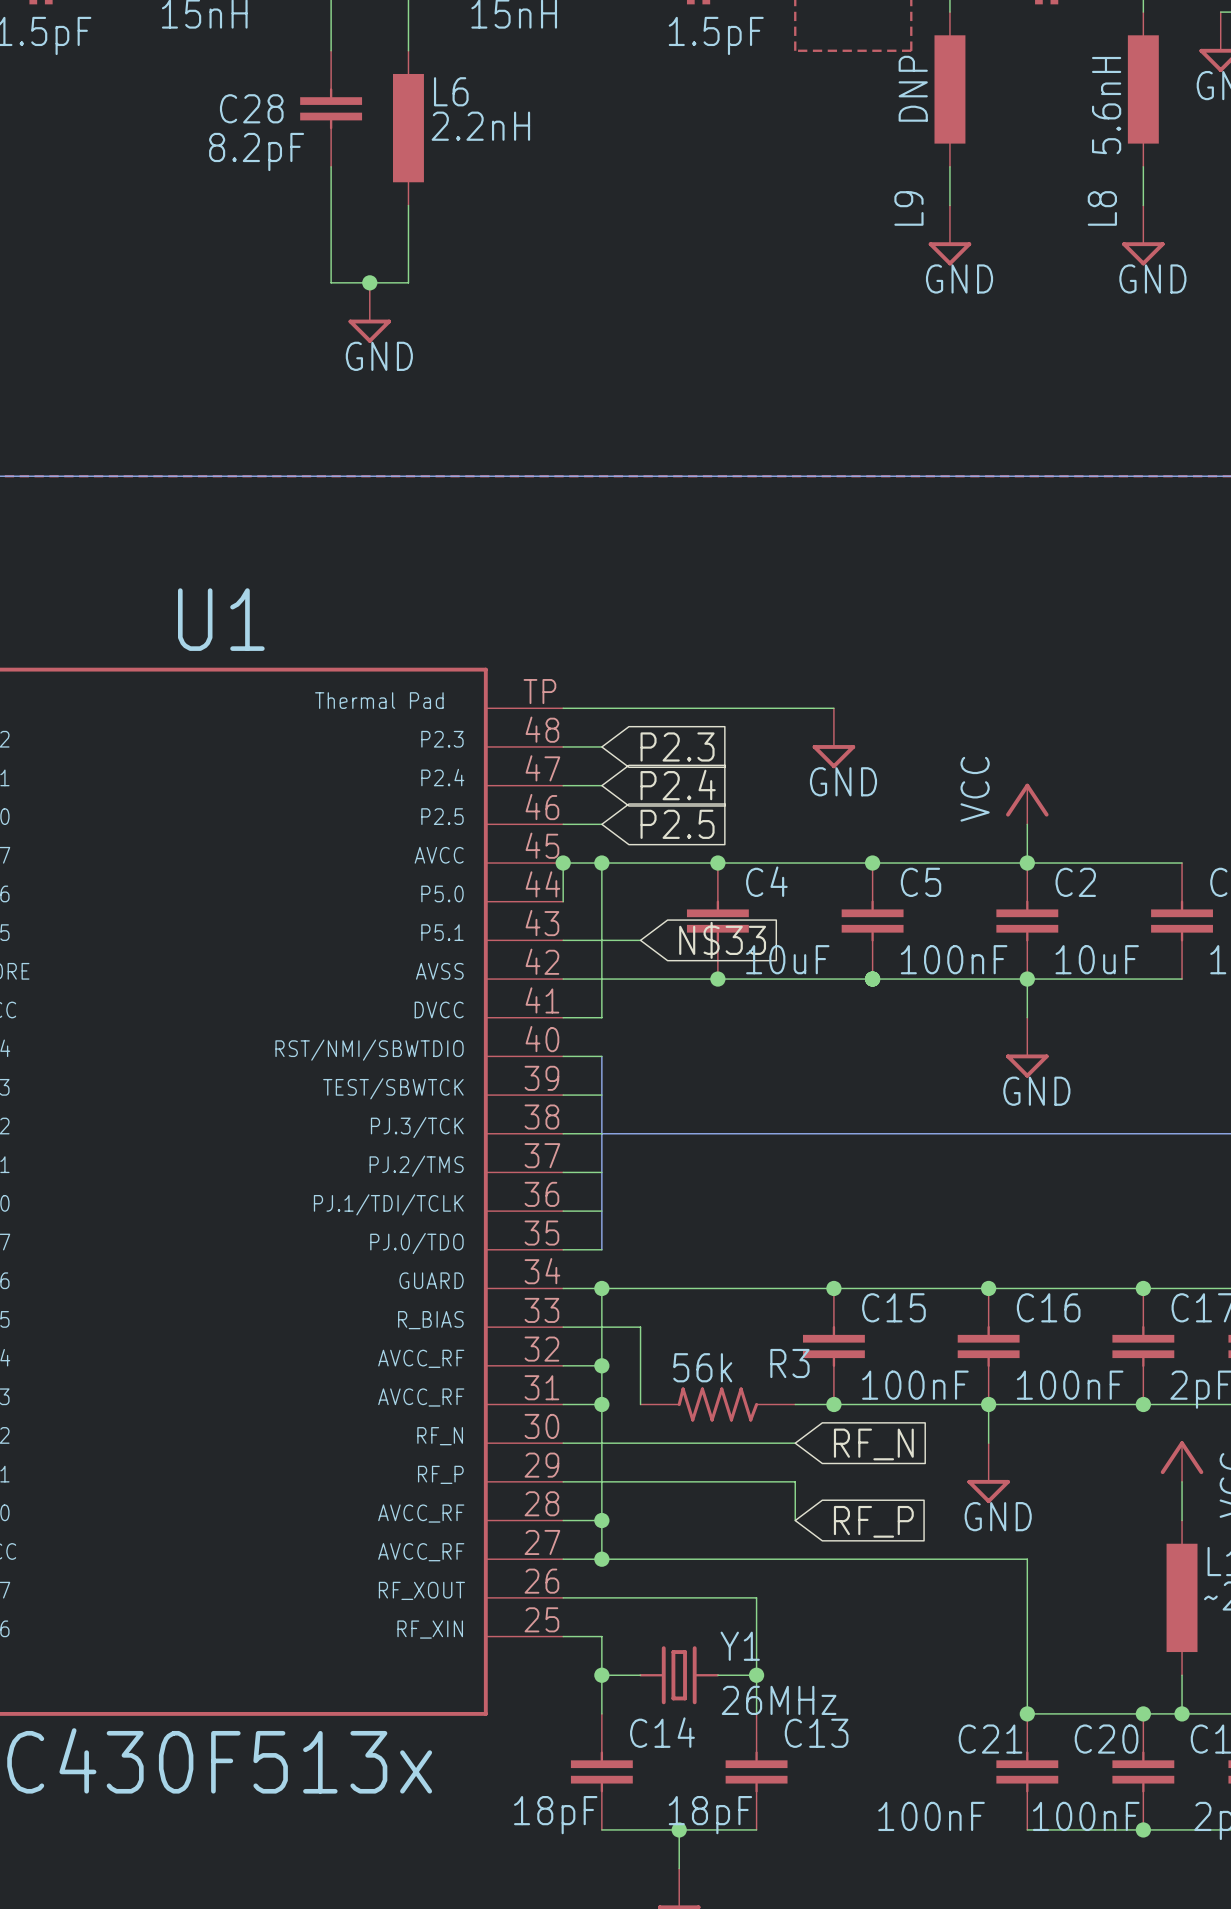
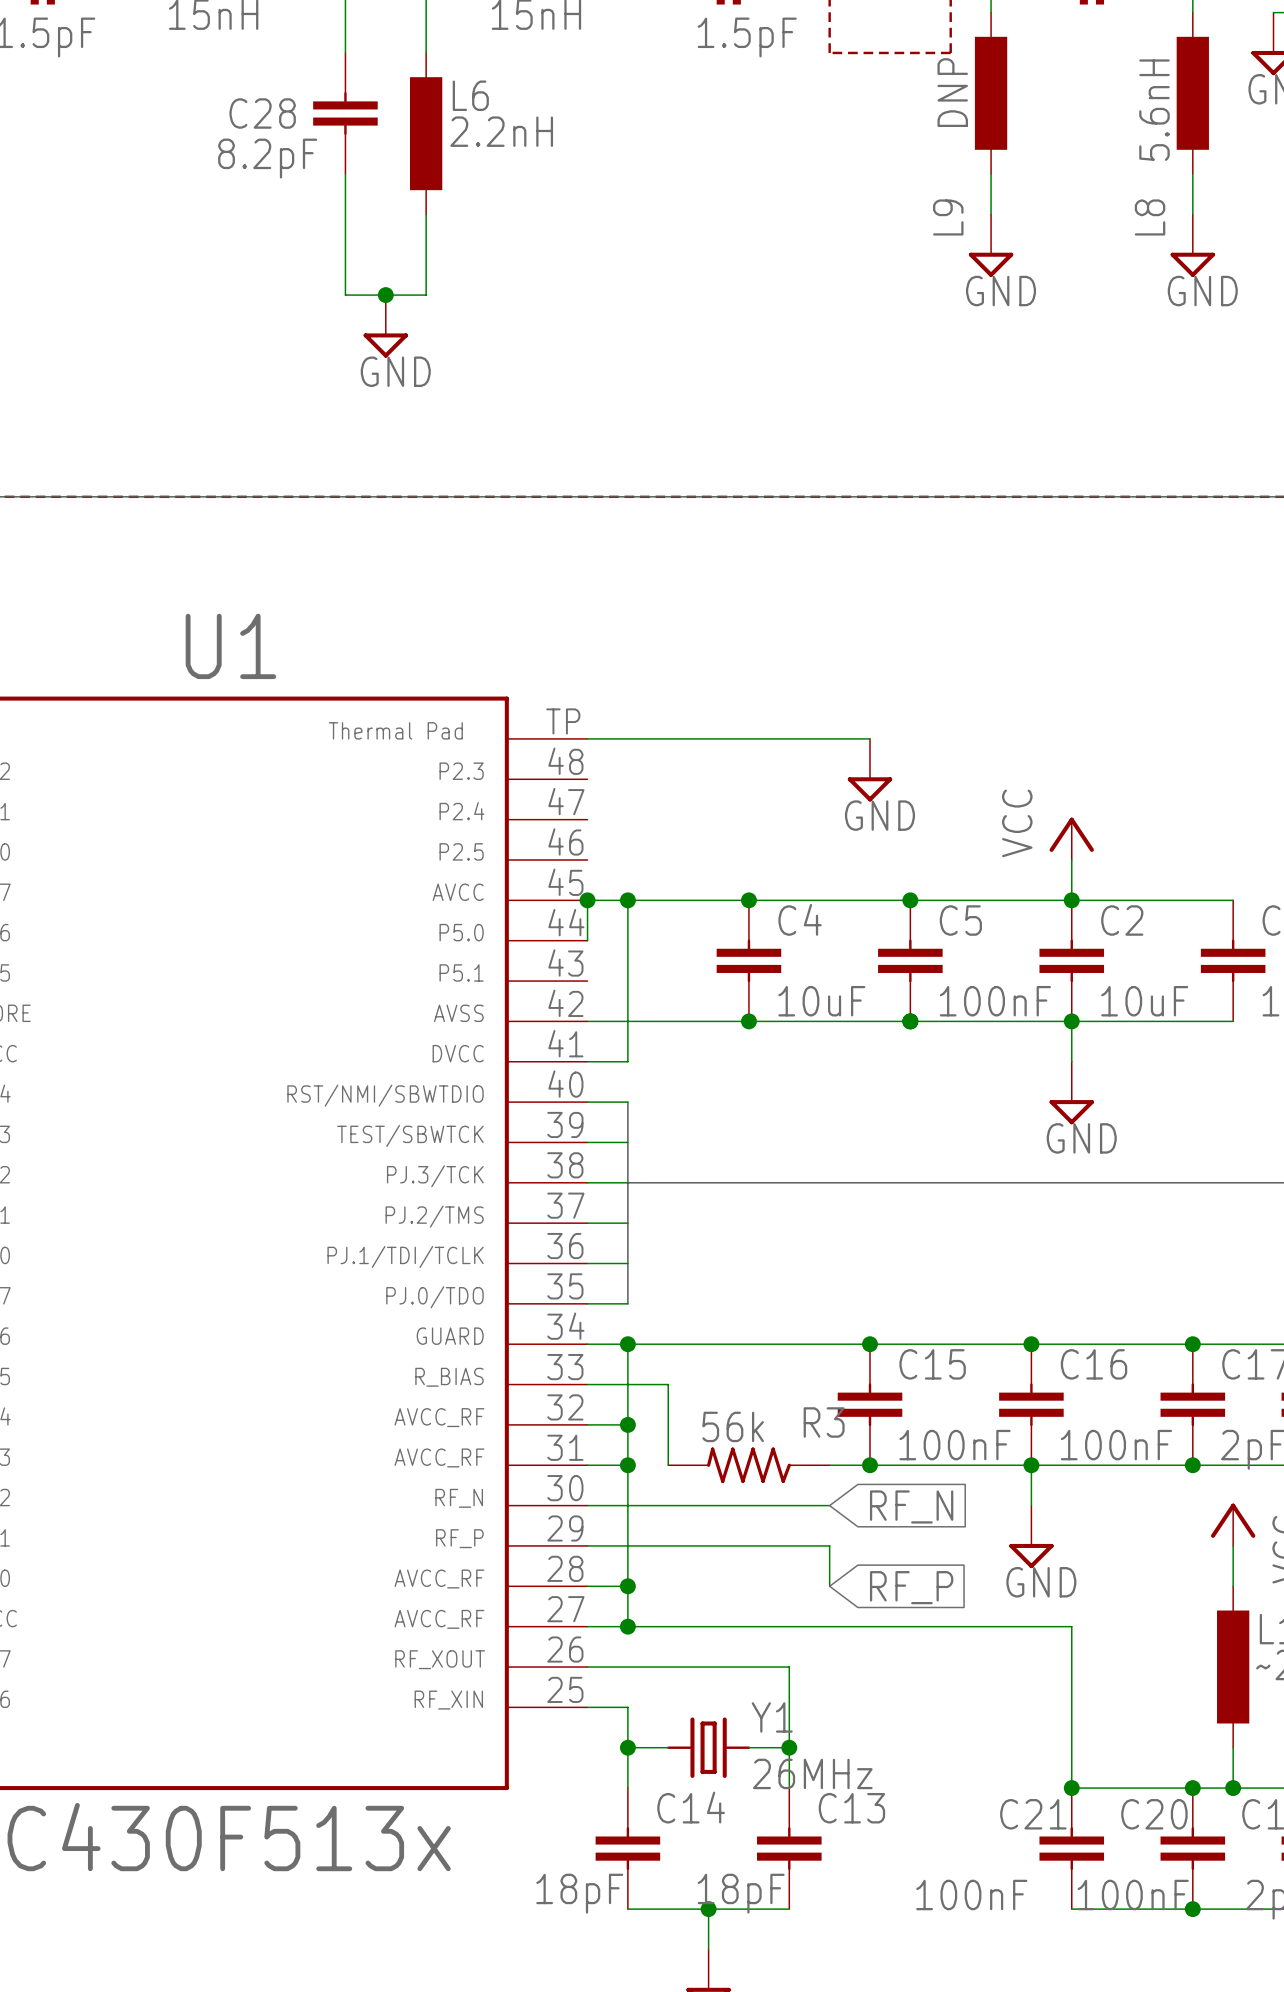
wire: (563, 746) (601, 746) -> none
global label: P2.3 (677, 746) -> none
wire: (563, 785) (601, 785) -> none
global label: P2.4 (678, 785) -> none
wire: (563, 824) (601, 824) -> none
global label: P2.5 (677, 824) -> none
wire: (563, 940) (640, 940) -> none
global label: N$33 (722, 940) -> none

